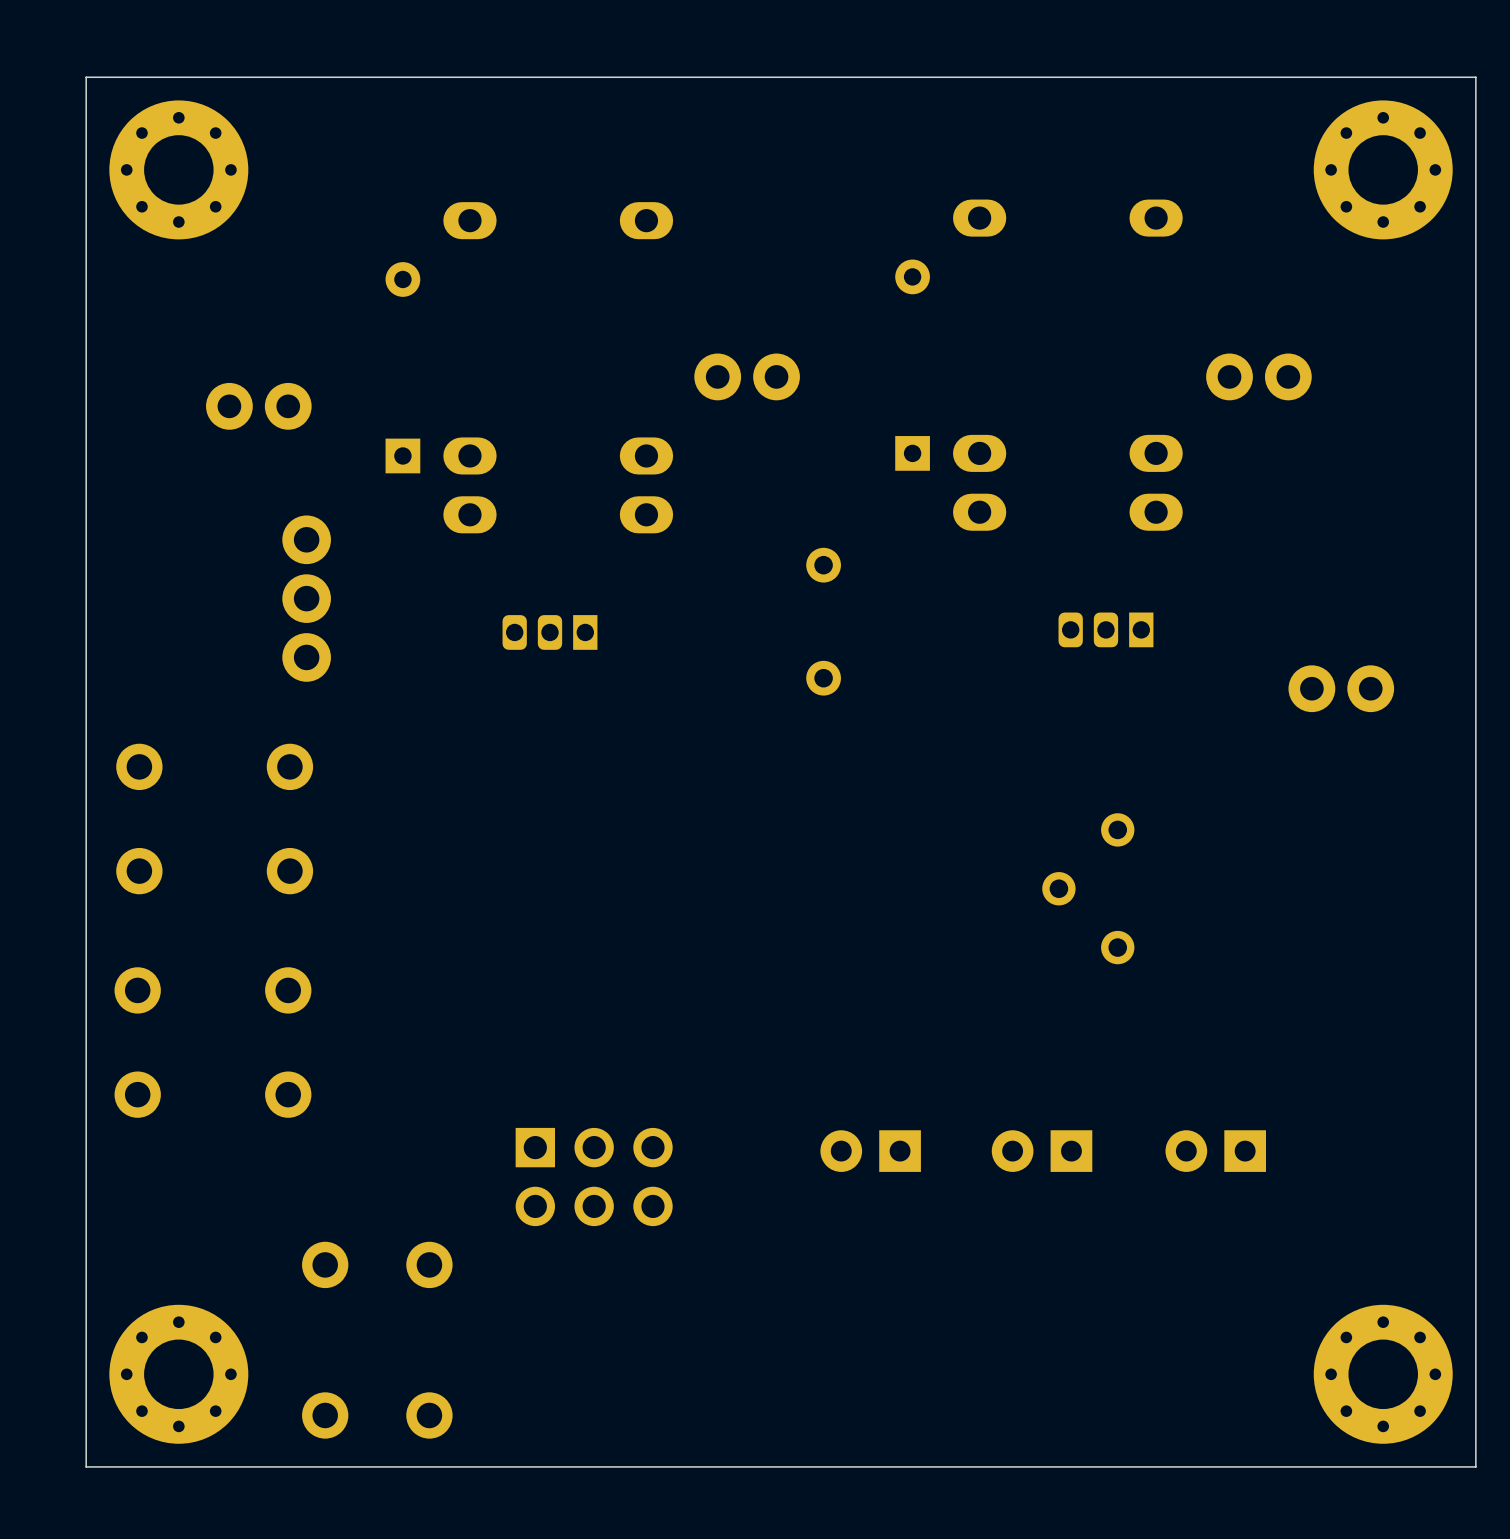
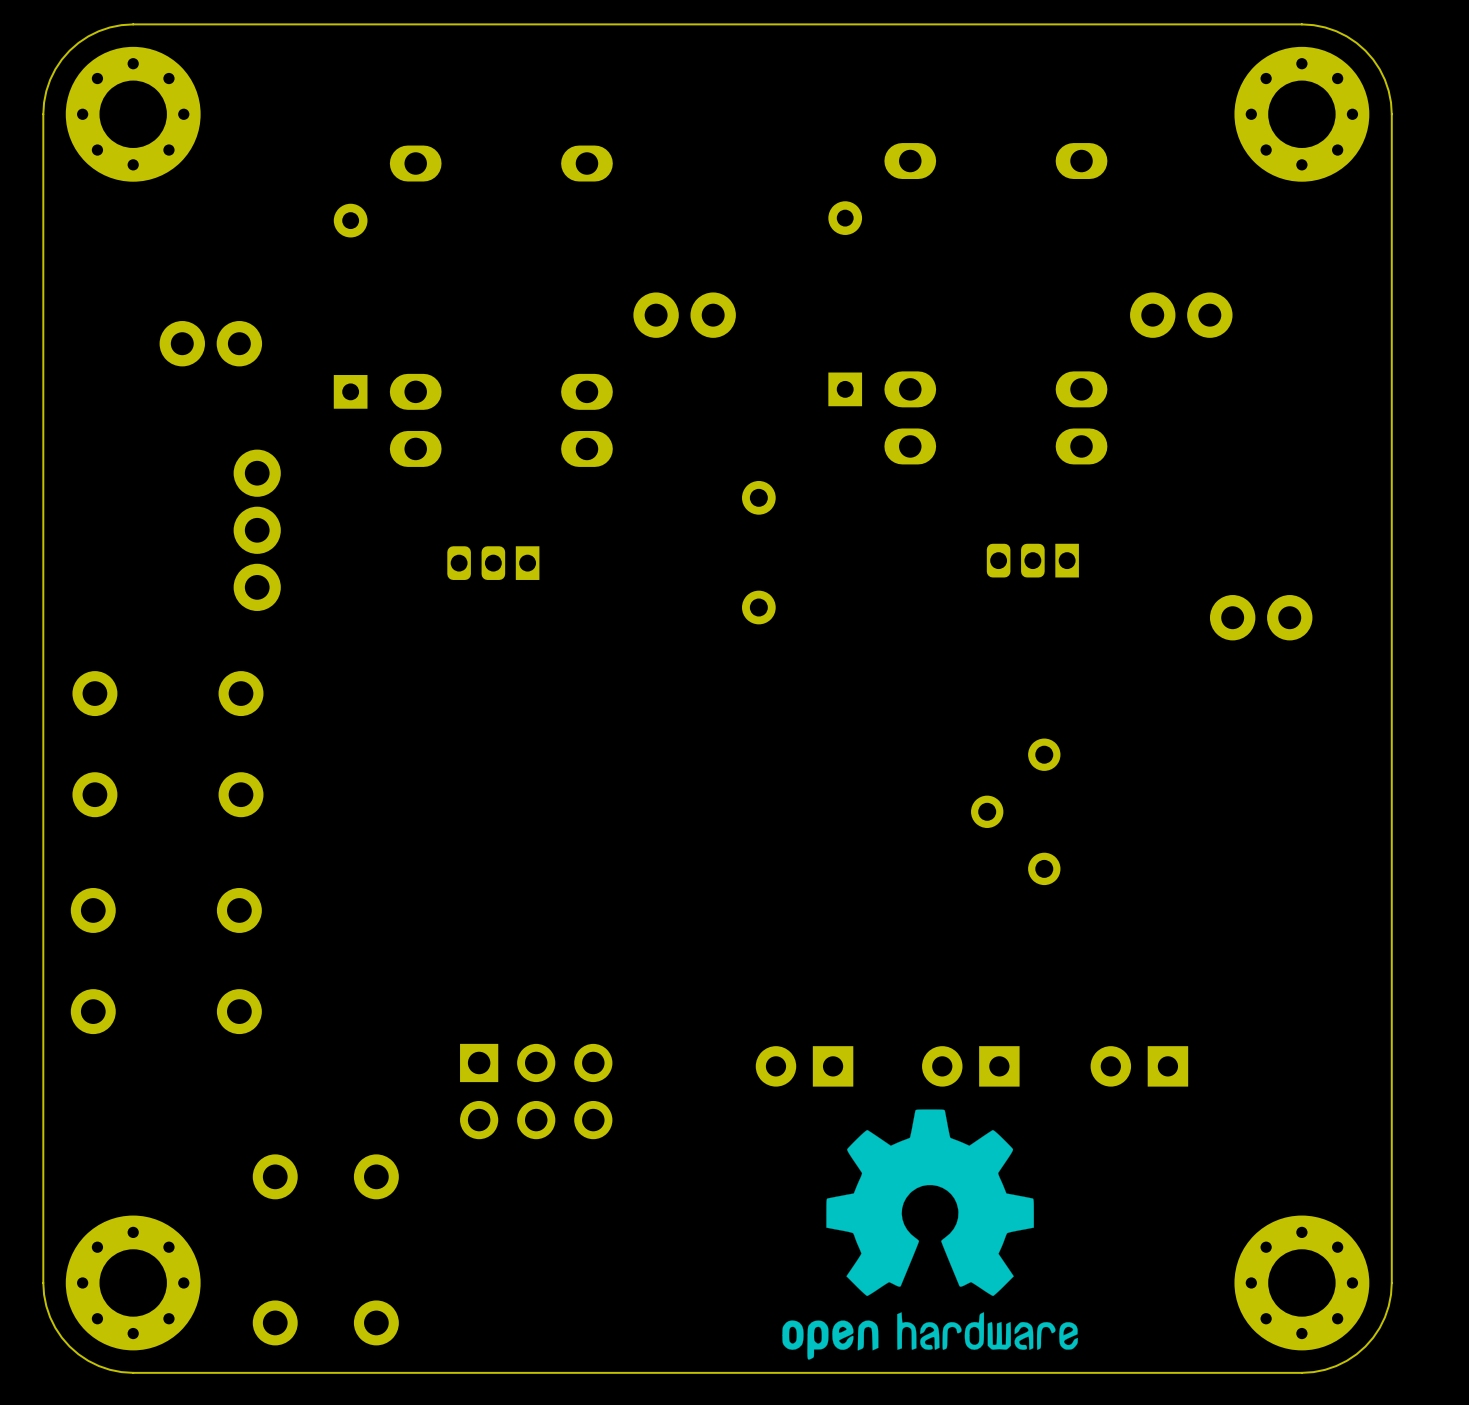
board edge: (178, 77) (86, 77) (86, 169) -> (133, 24) (121, 25) (98, 31) (78, 42) (69, 50) (61, 59) (50, 79) (46, 91) (43, 114)
board edge: (1383, 77) (1475, 77) (1475, 169) -> (1301, 24) (1313, 25) (1336, 31) (1346, 36) (1365, 50) (1373, 59) (1384, 79) (1388, 91) (1391, 114)
drawing: none -> [782, 1109, 1078, 1360]
board edge: (86, 1374) (86, 1466) (178, 1466) -> (43, 1282) (46, 1306) (50, 1317) (61, 1337) (69, 1346) (78, 1354) (98, 1366) (109, 1369) (133, 1372)
board edge: (1475, 1374) (1475, 1466) (1383, 1466) -> (1391, 1282) (1388, 1306) (1384, 1317) (1373, 1337) (1365, 1346) (1356, 1354) (1336, 1366) (1325, 1369) (1301, 1372)

